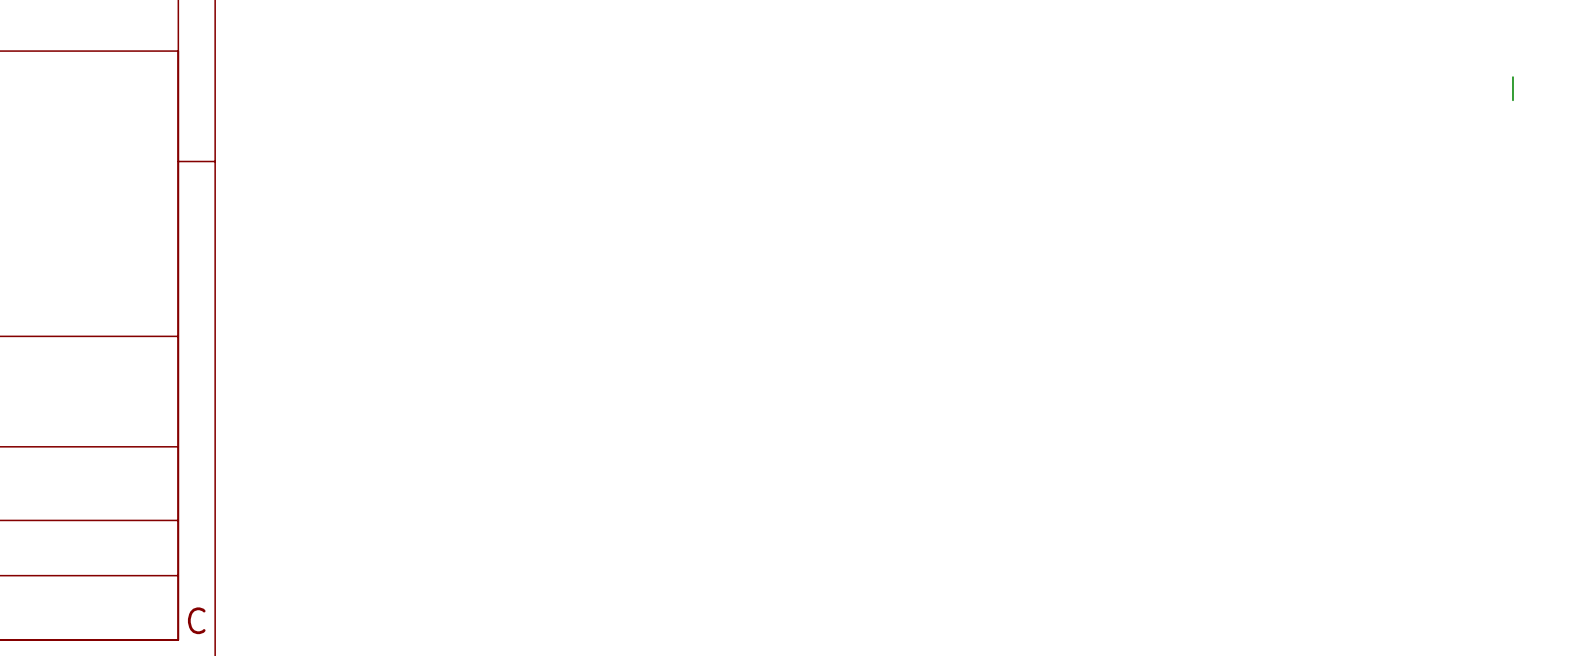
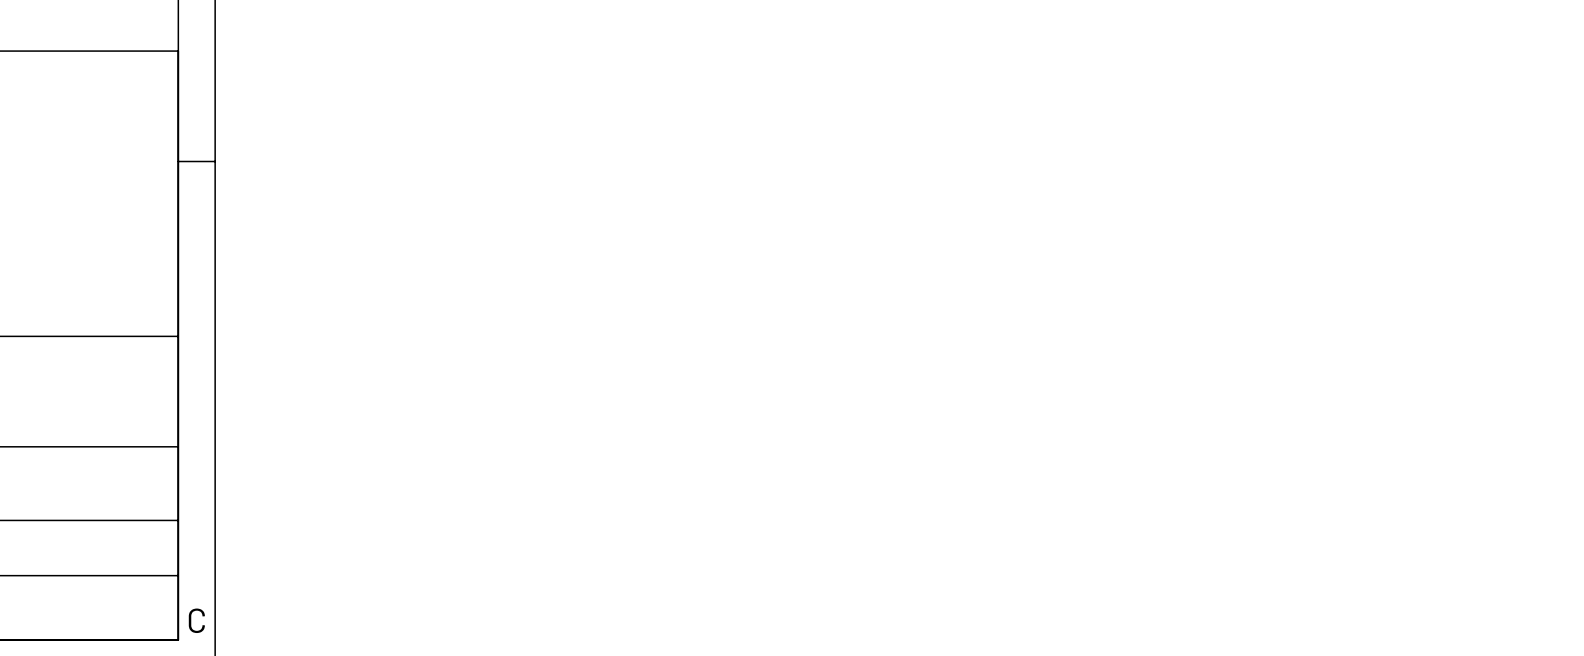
wire: (1512, 77) (1512, 100) -> none

